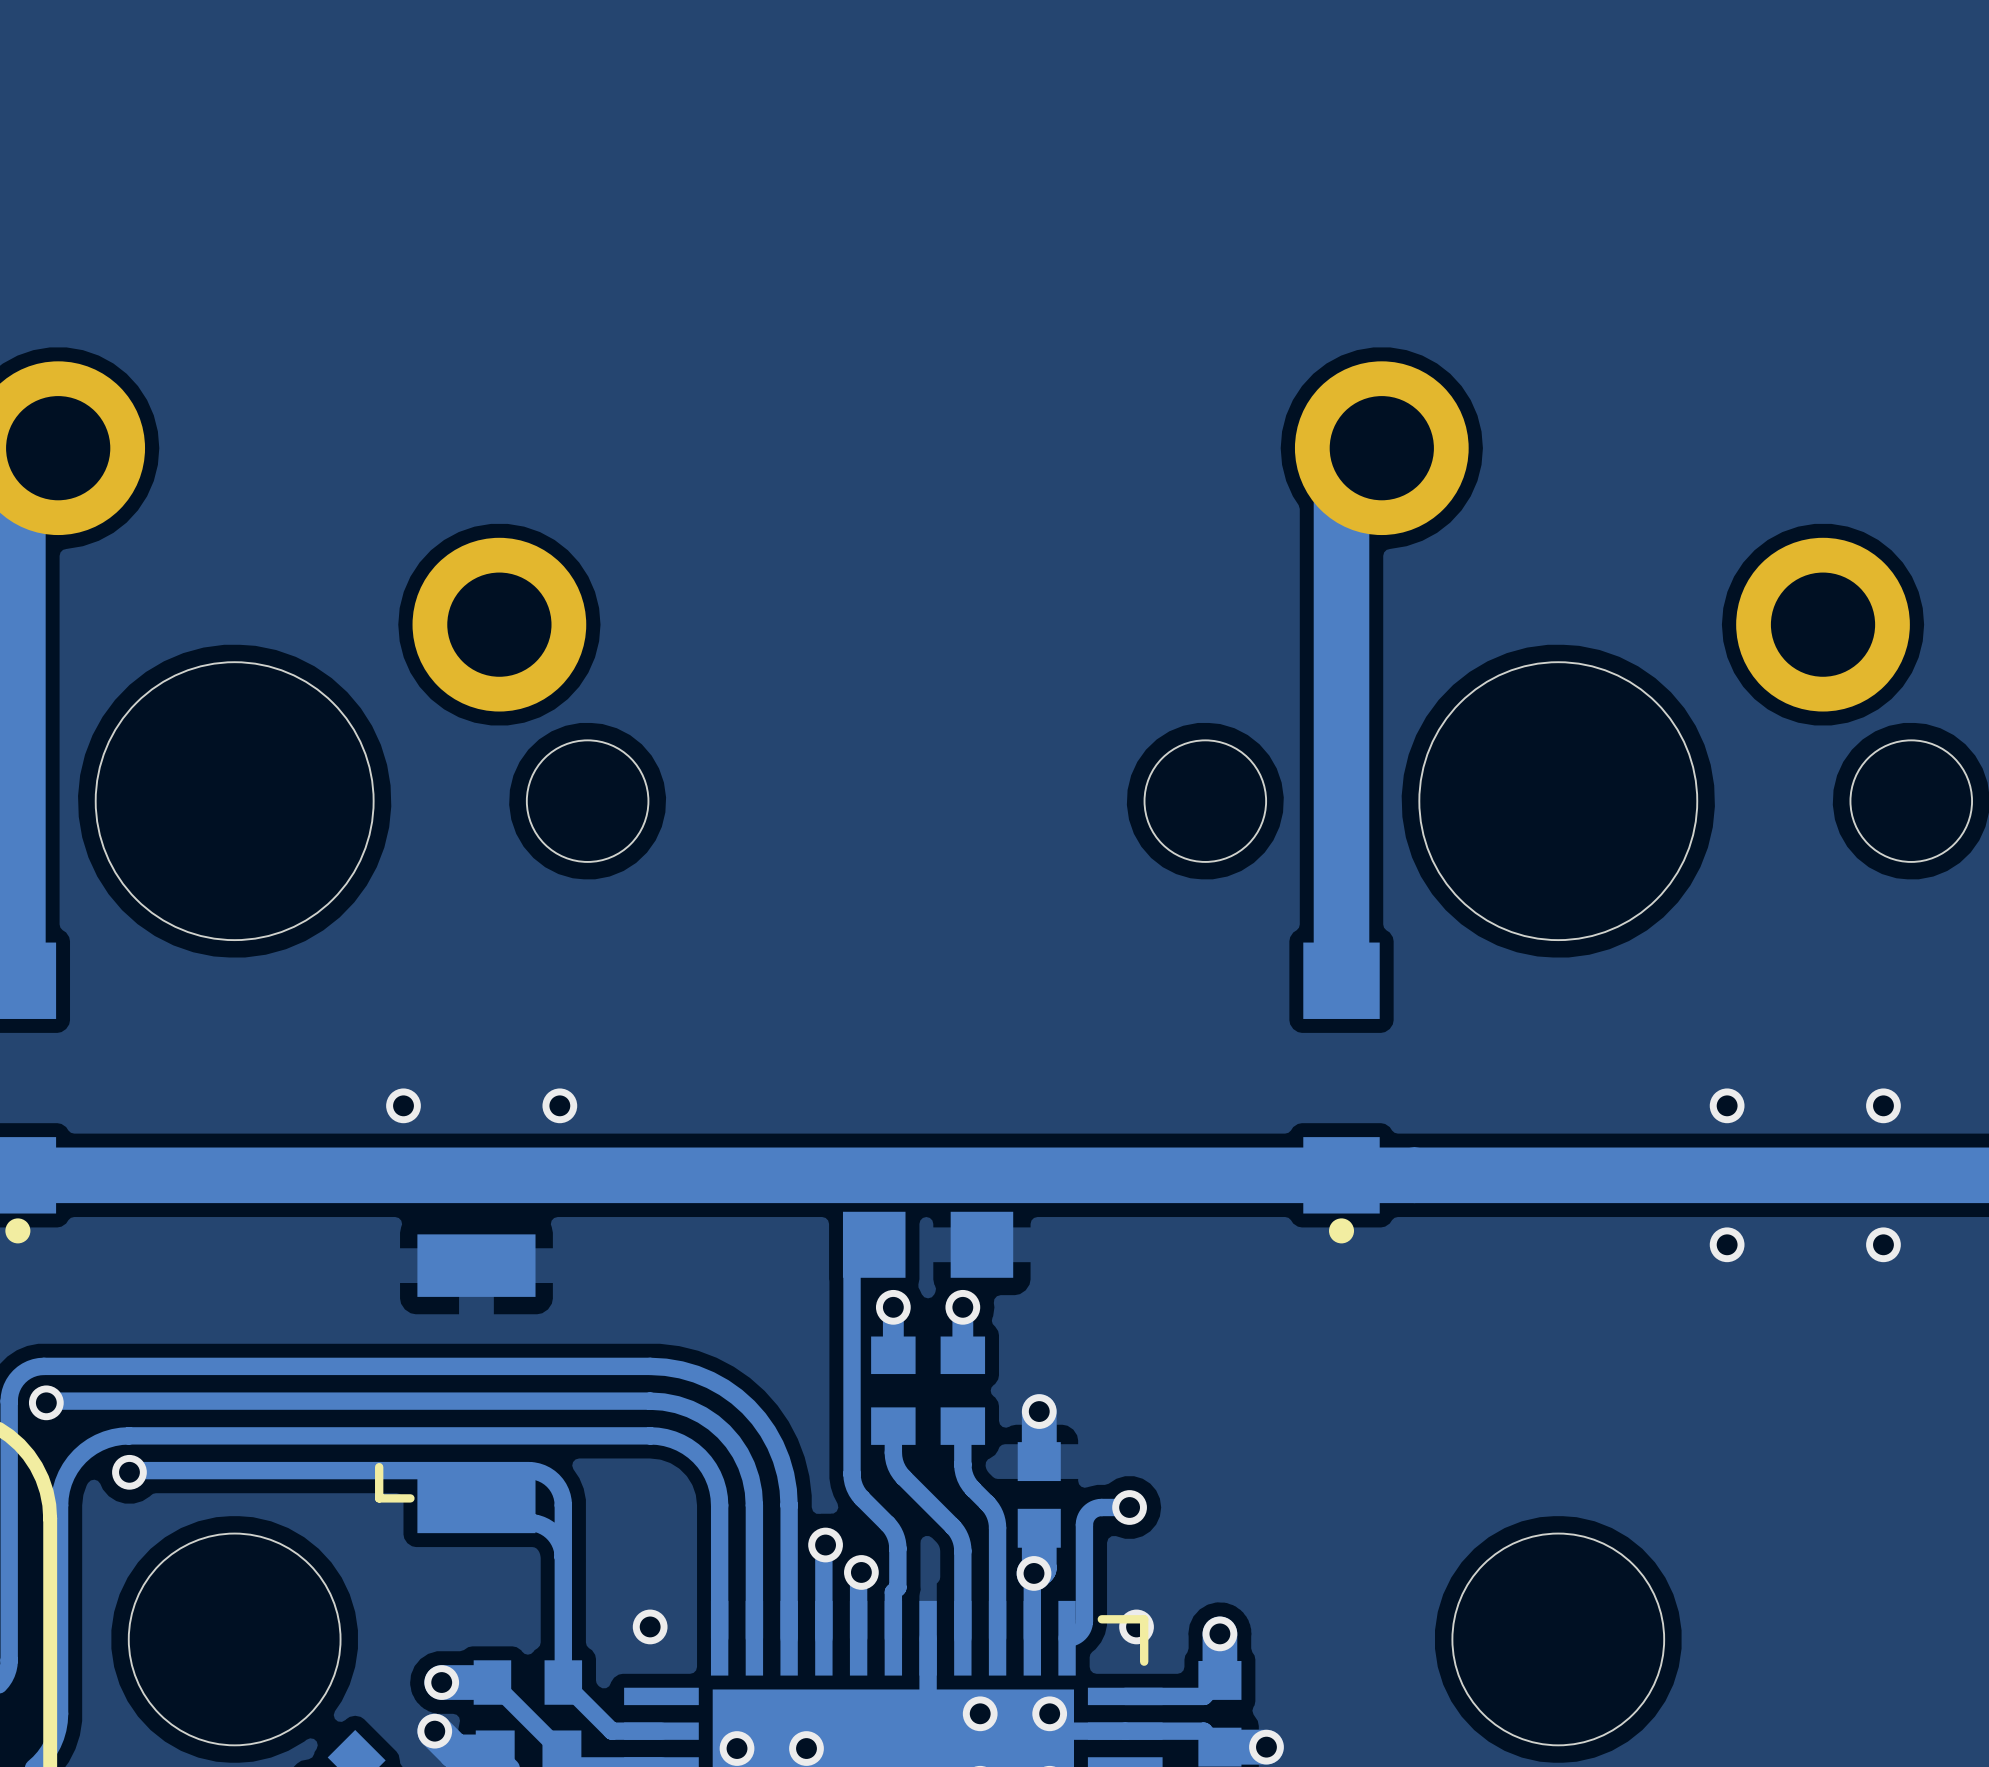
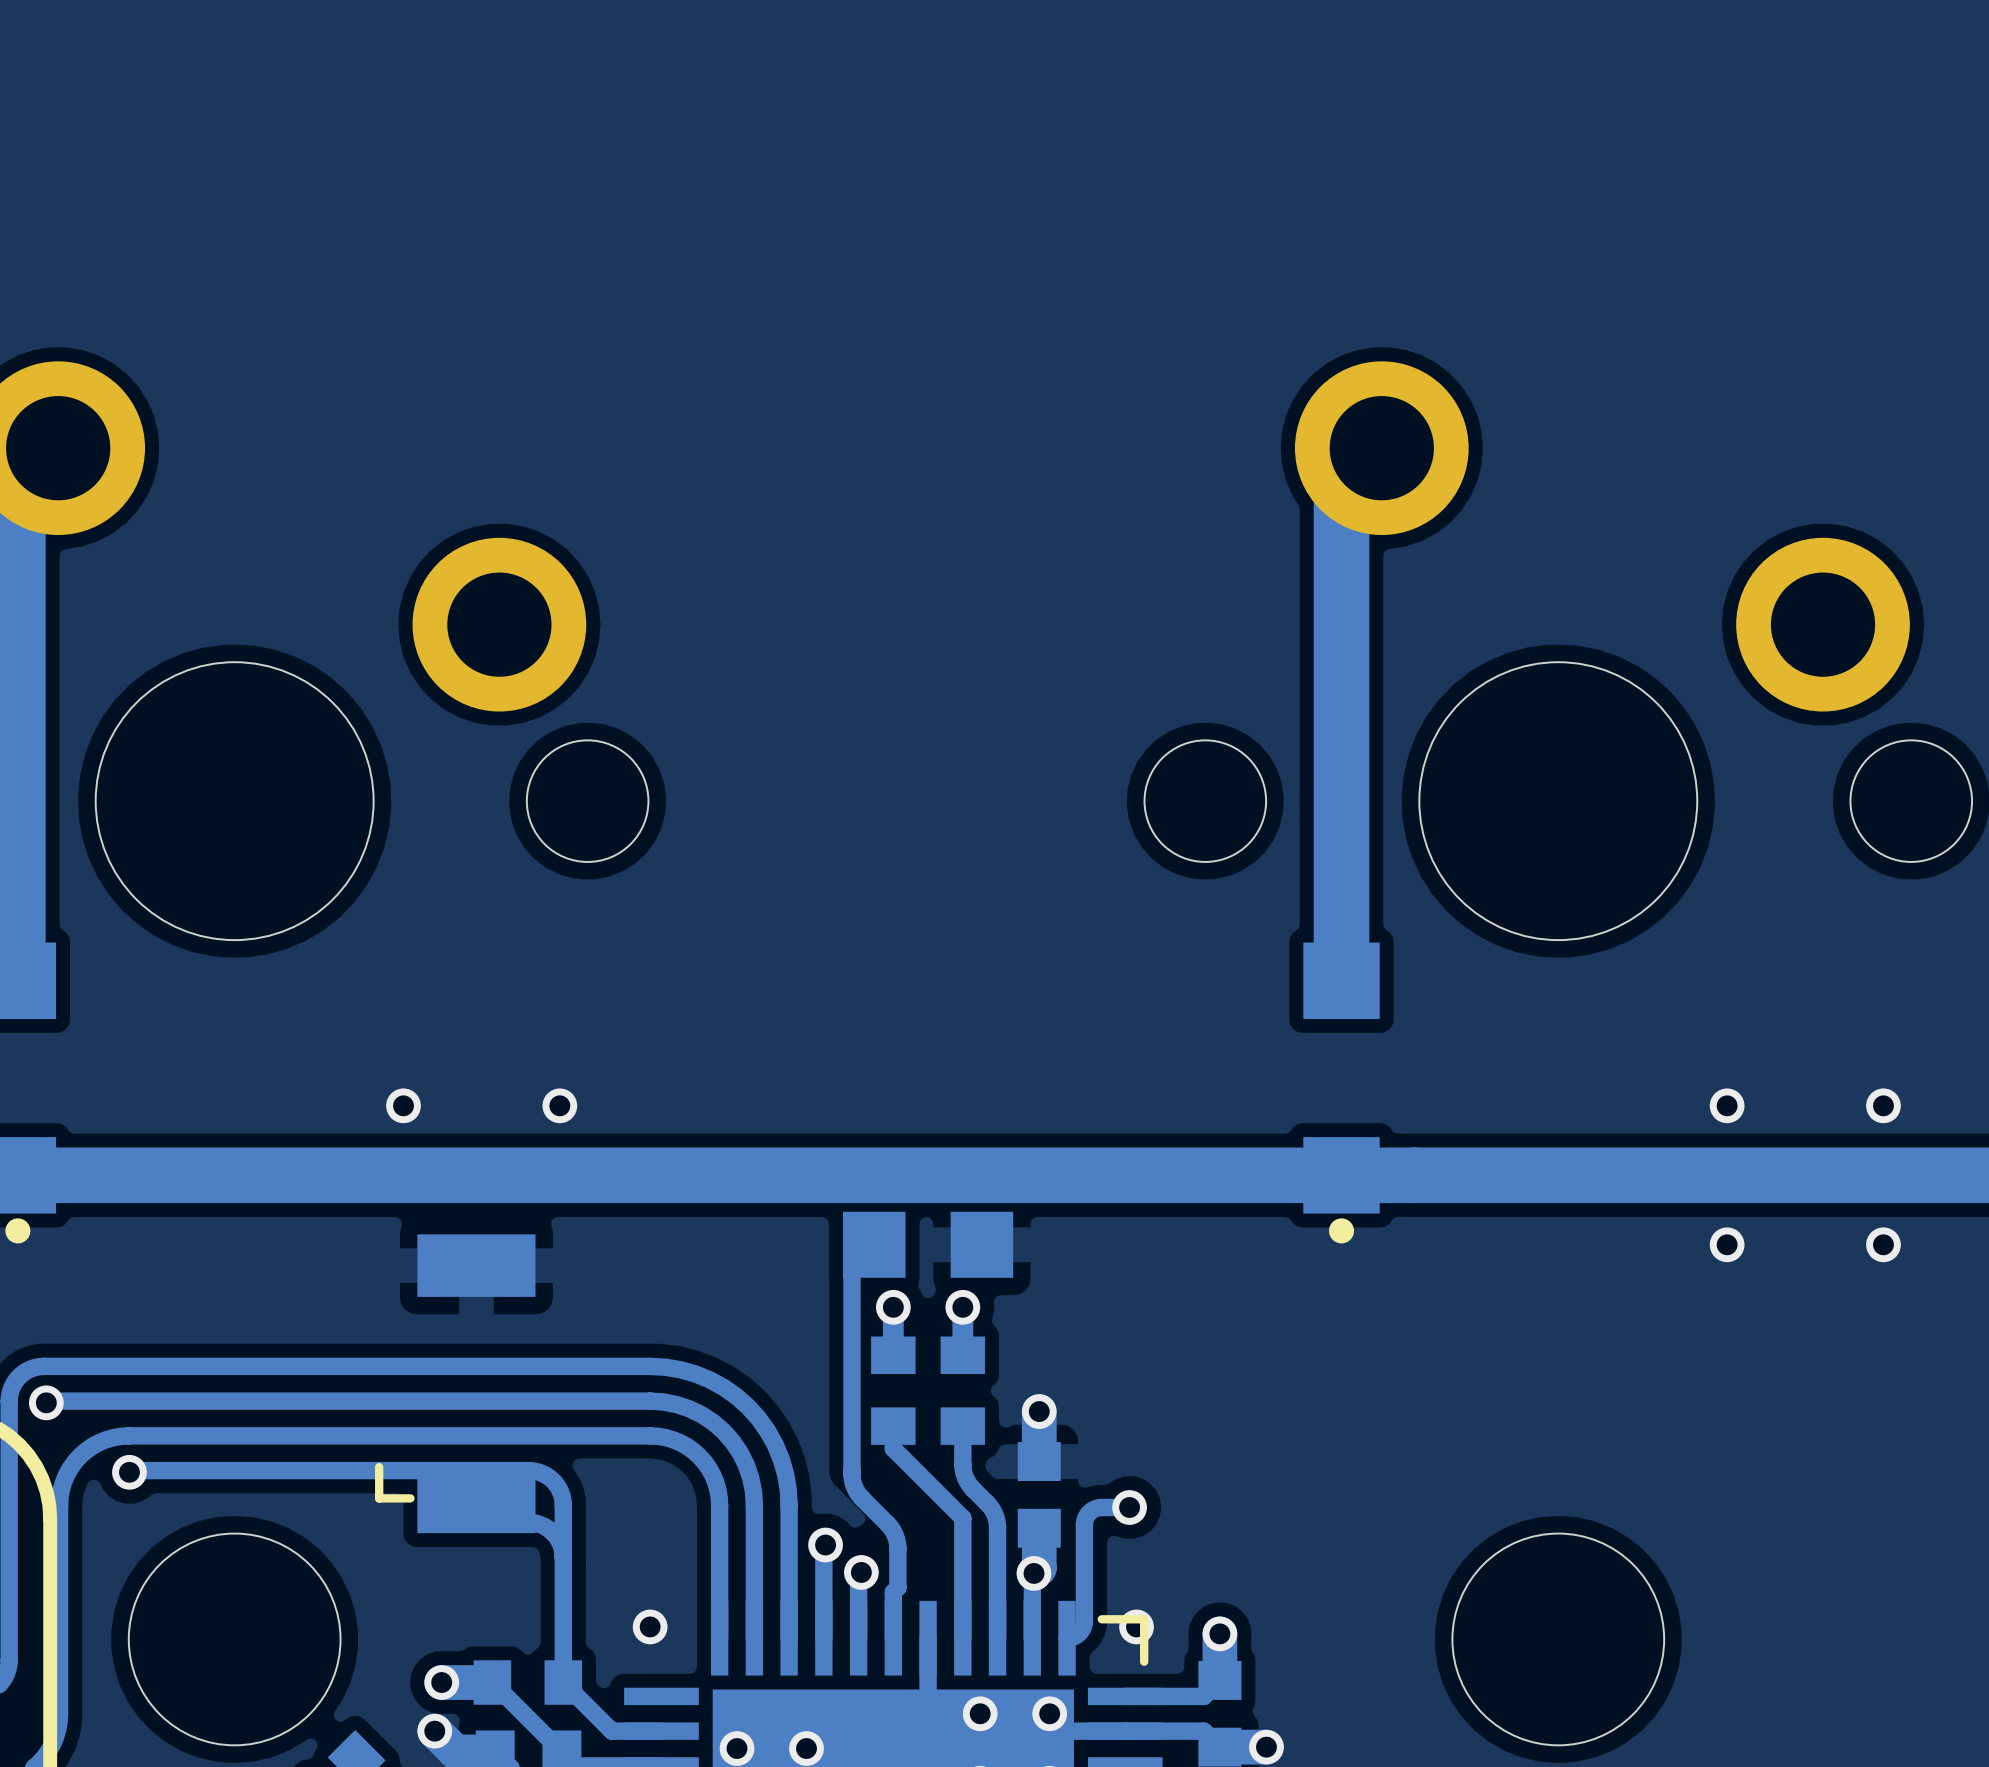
track: (893, 1448) (894, 1461) (900, 1473) (954, 1528) (960, 1537) (962, 1551) -> (893, 1448) (962, 1518) (962, 1551)

